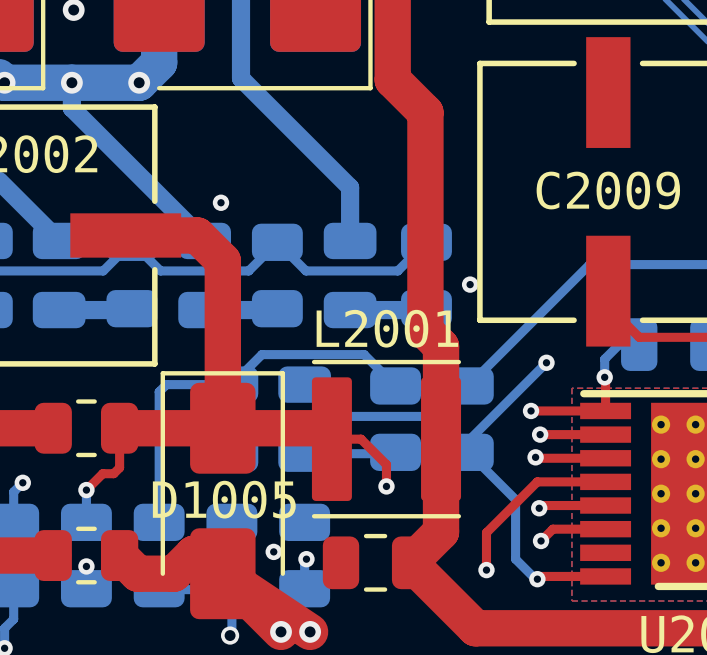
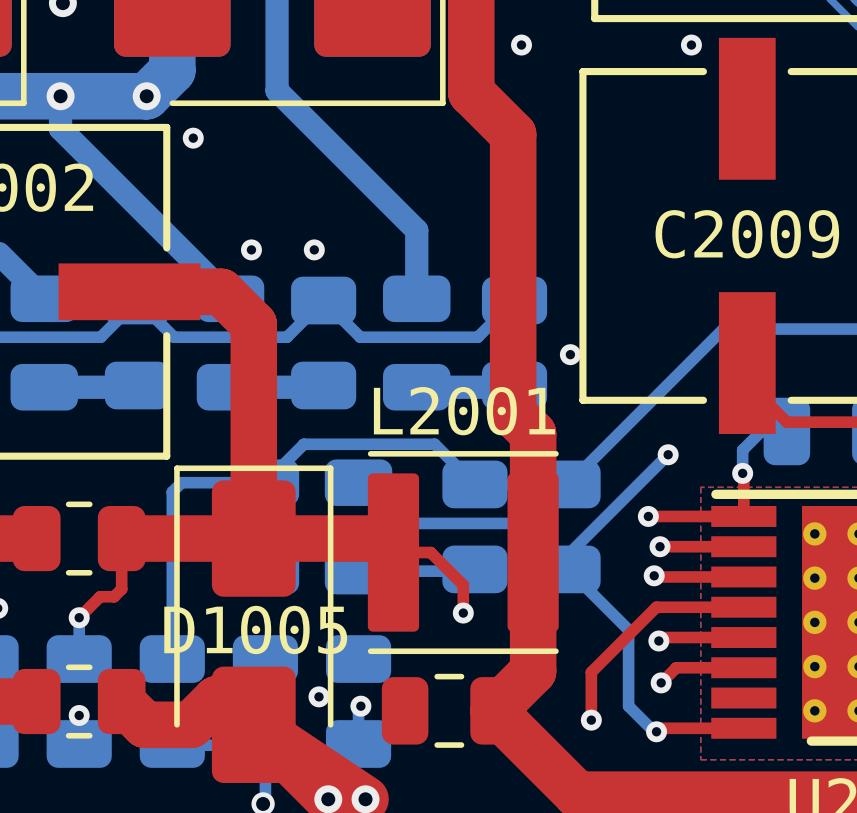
via: none -> (521, 45)
via: none -> (691, 45)
via: none -> (193, 138)
via: none -> (314, 249)

